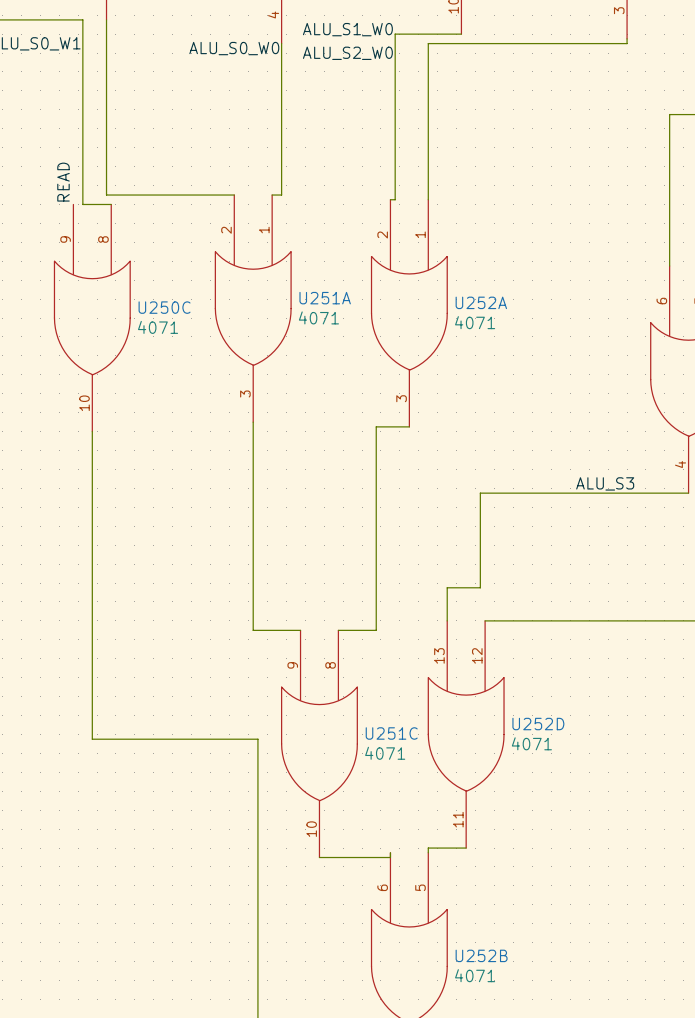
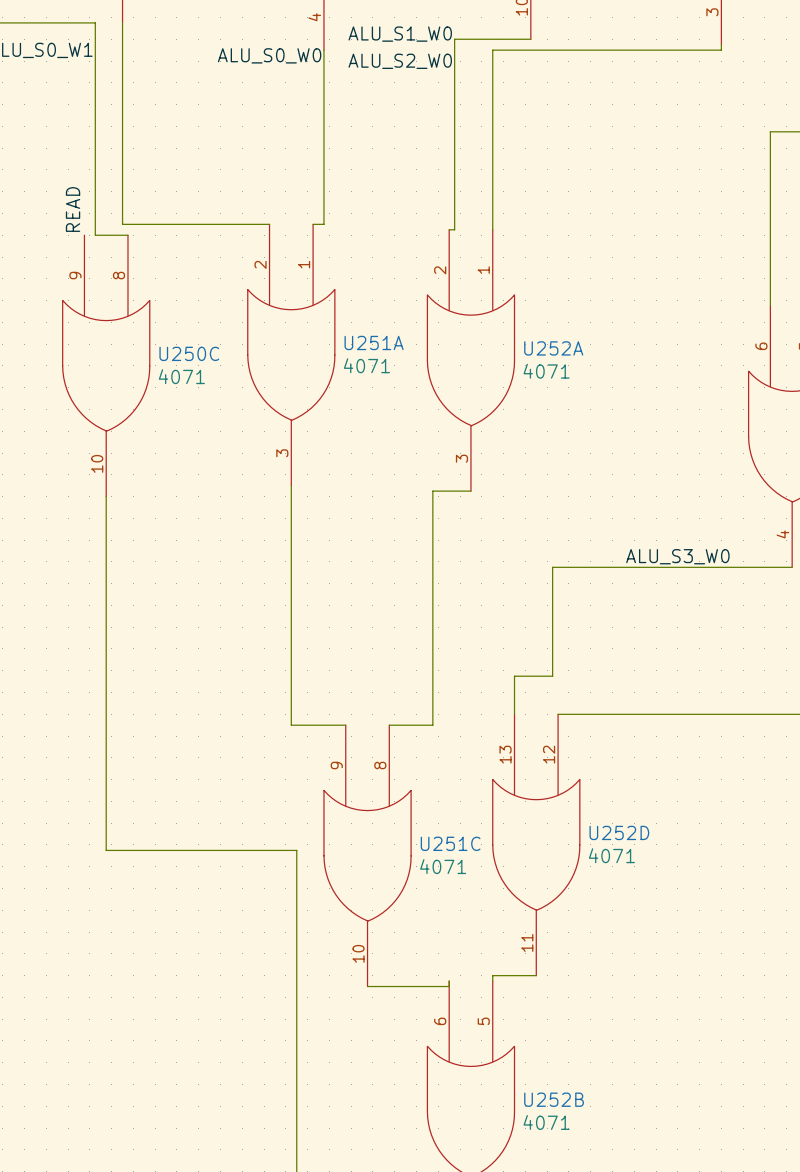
label: ALU_S3 (605, 483) -> ALU_S3_W0 (677, 556)

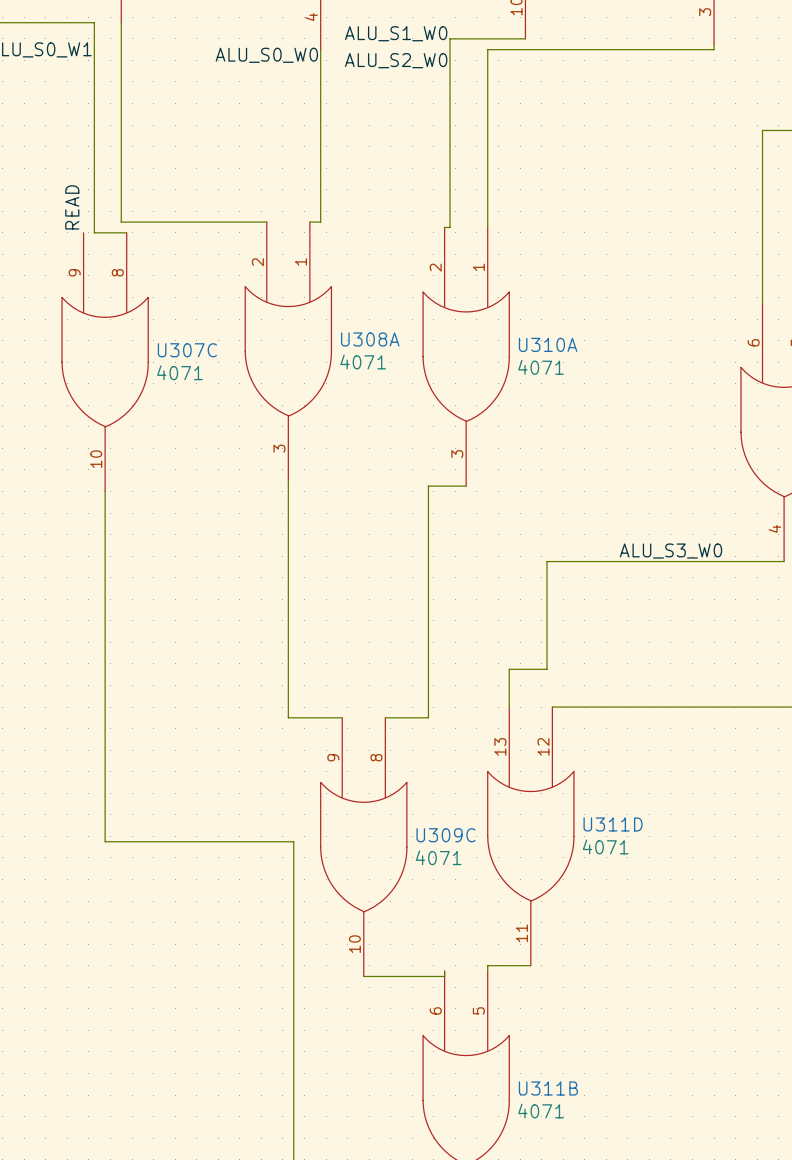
U251A name: U251A (374, 342) -> U308A (370, 339)
U252A name: U252A (553, 348) -> U310A (548, 344)
U250C name: U250C (189, 353) -> U307C (187, 350)
U252D name: U252D (619, 832) -> U311D (613, 824)
U251C name: U251C (450, 843) -> U309C (446, 835)
U252B name: U252B (554, 1099) -> U311B (548, 1088)

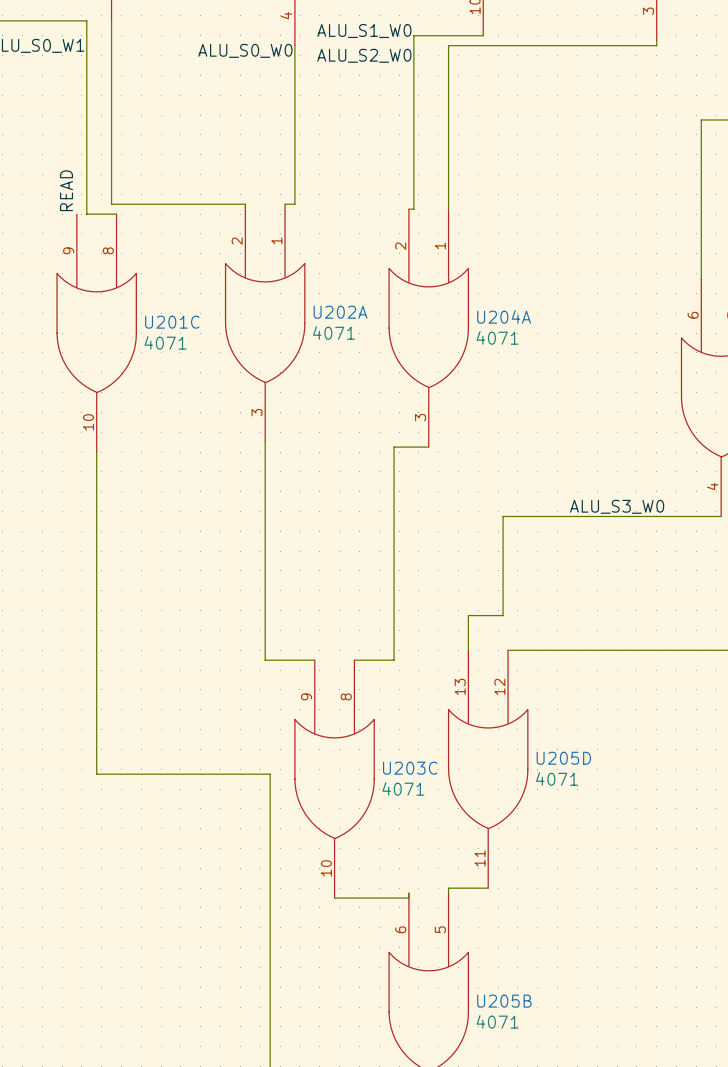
U308A name: U308A (370, 339) -> U202A (340, 312)
U310A name: U310A (548, 344) -> U204A (504, 316)
U307C name: U307C (187, 350) -> U201C (172, 322)
U311D name: U311D (613, 824) -> U205D (563, 758)
U309C name: U309C (446, 835) -> U203C (410, 768)
U311B name: U311B (548, 1088) -> U205B (504, 1001)

